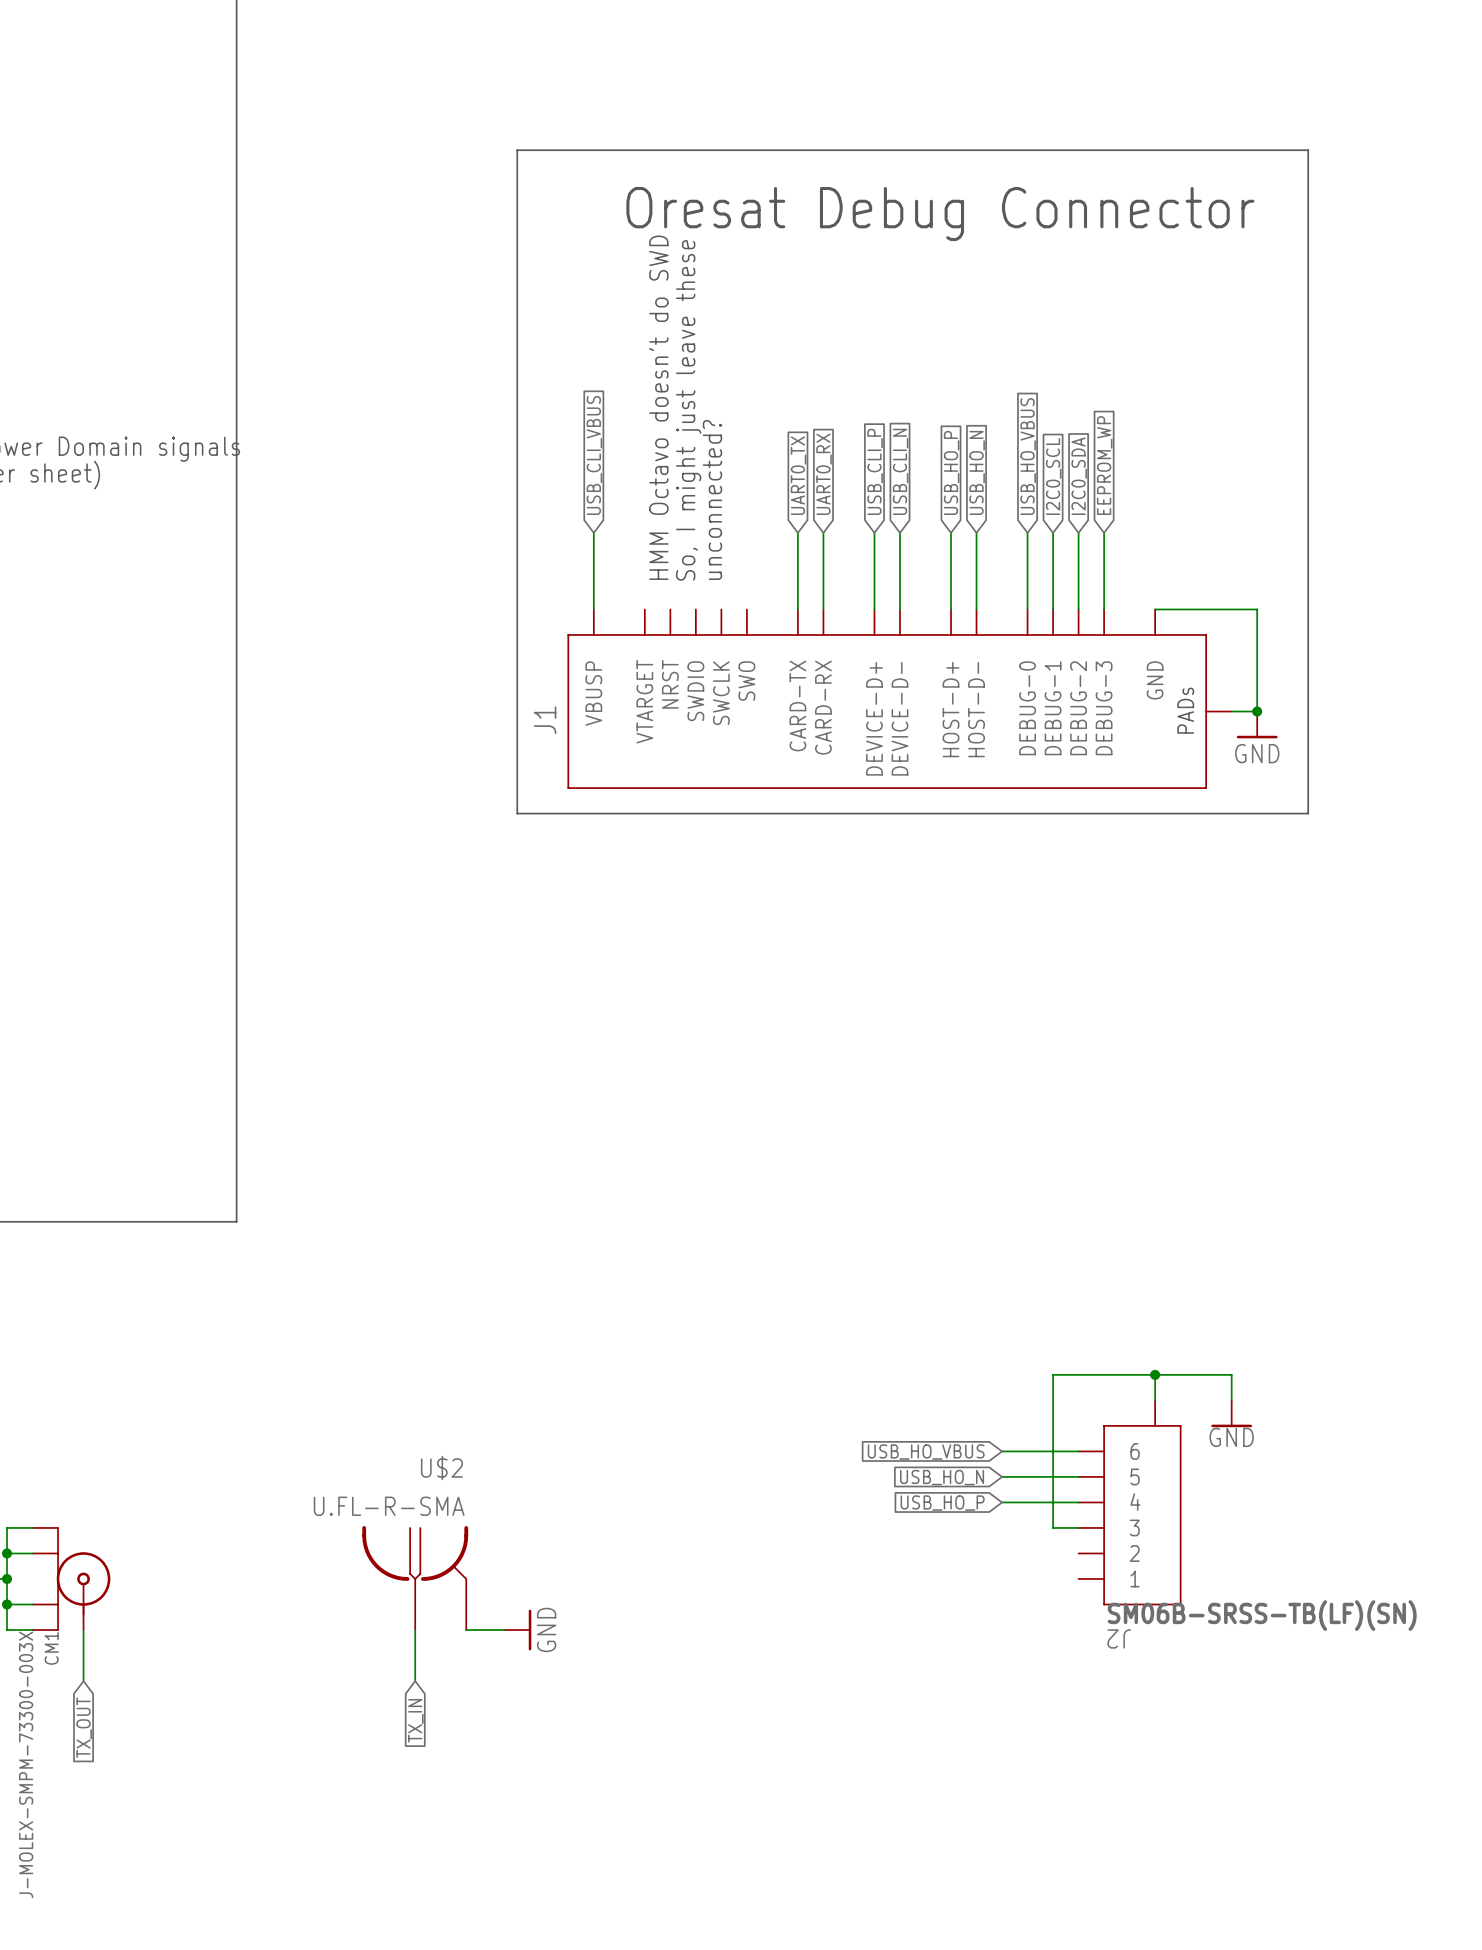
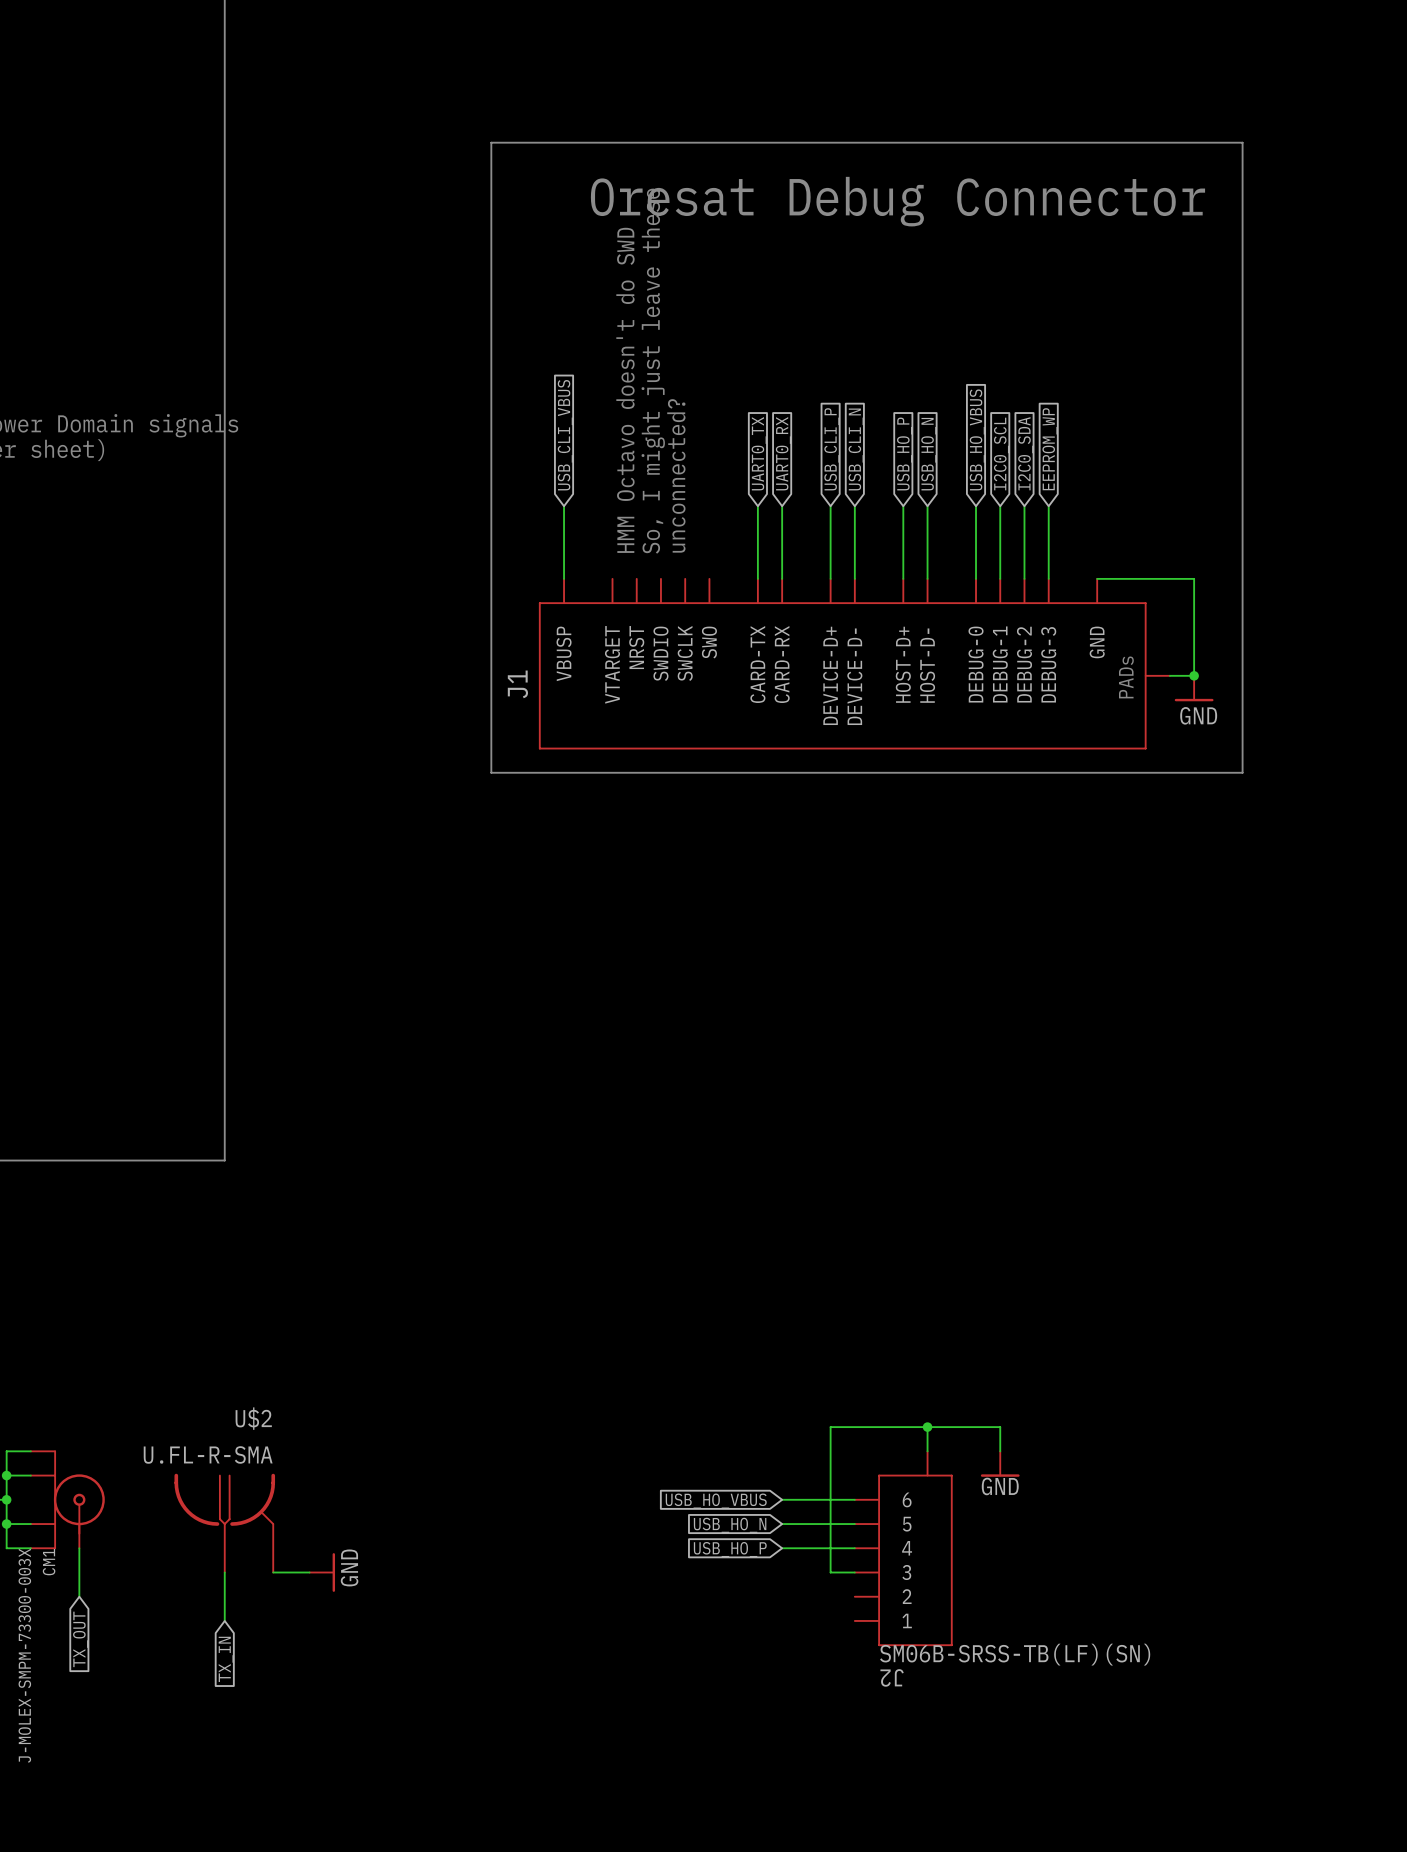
wire: (1155, 1374) (1155, 1400) -> (927, 1427) (927, 1451)
junction: (1155, 1374) -> none
wire: (1231, 1400) (1231, 1374) (1053, 1374) (1053, 1502) (1078, 1502) -> none
power symbol position: GND (1231, 1413) -> GND (1000, 1464)
wire: (1002, 1451) (1078, 1451) -> (782, 1499) (854, 1499)
global label position: USB_HO_VBUS (926, 1452) -> USB_HO_VBUS (716, 1501)
wire: (1002, 1476) (1078, 1476) -> (782, 1524) (854, 1524)
global label position: USB_HO_N (942, 1477) -> USB_HO_N (730, 1525)
junction: none -> (927, 1427)
wire: none -> (951, 1427) (830, 1427) (830, 1572) (854, 1572)
J2 position: (1129, 1502) -> (903, 1548)
global label position: USB_HO_P (942, 1503) -> USB_HO_P (730, 1549)
wire: (1053, 1527) (1078, 1527) -> none
U$2 position: (415, 1578) -> (224, 1523)
wire: (415, 1630) (415, 1681) -> (224, 1572) (224, 1620)
wire: (466, 1630) (504, 1630) -> (273, 1572) (309, 1572)
power symbol position: GND (517, 1630) -> GND (322, 1572)
wire: none -> (782, 1548) (854, 1548)
global label position: TX_IN (415, 1720) -> TX_IN (226, 1659)

